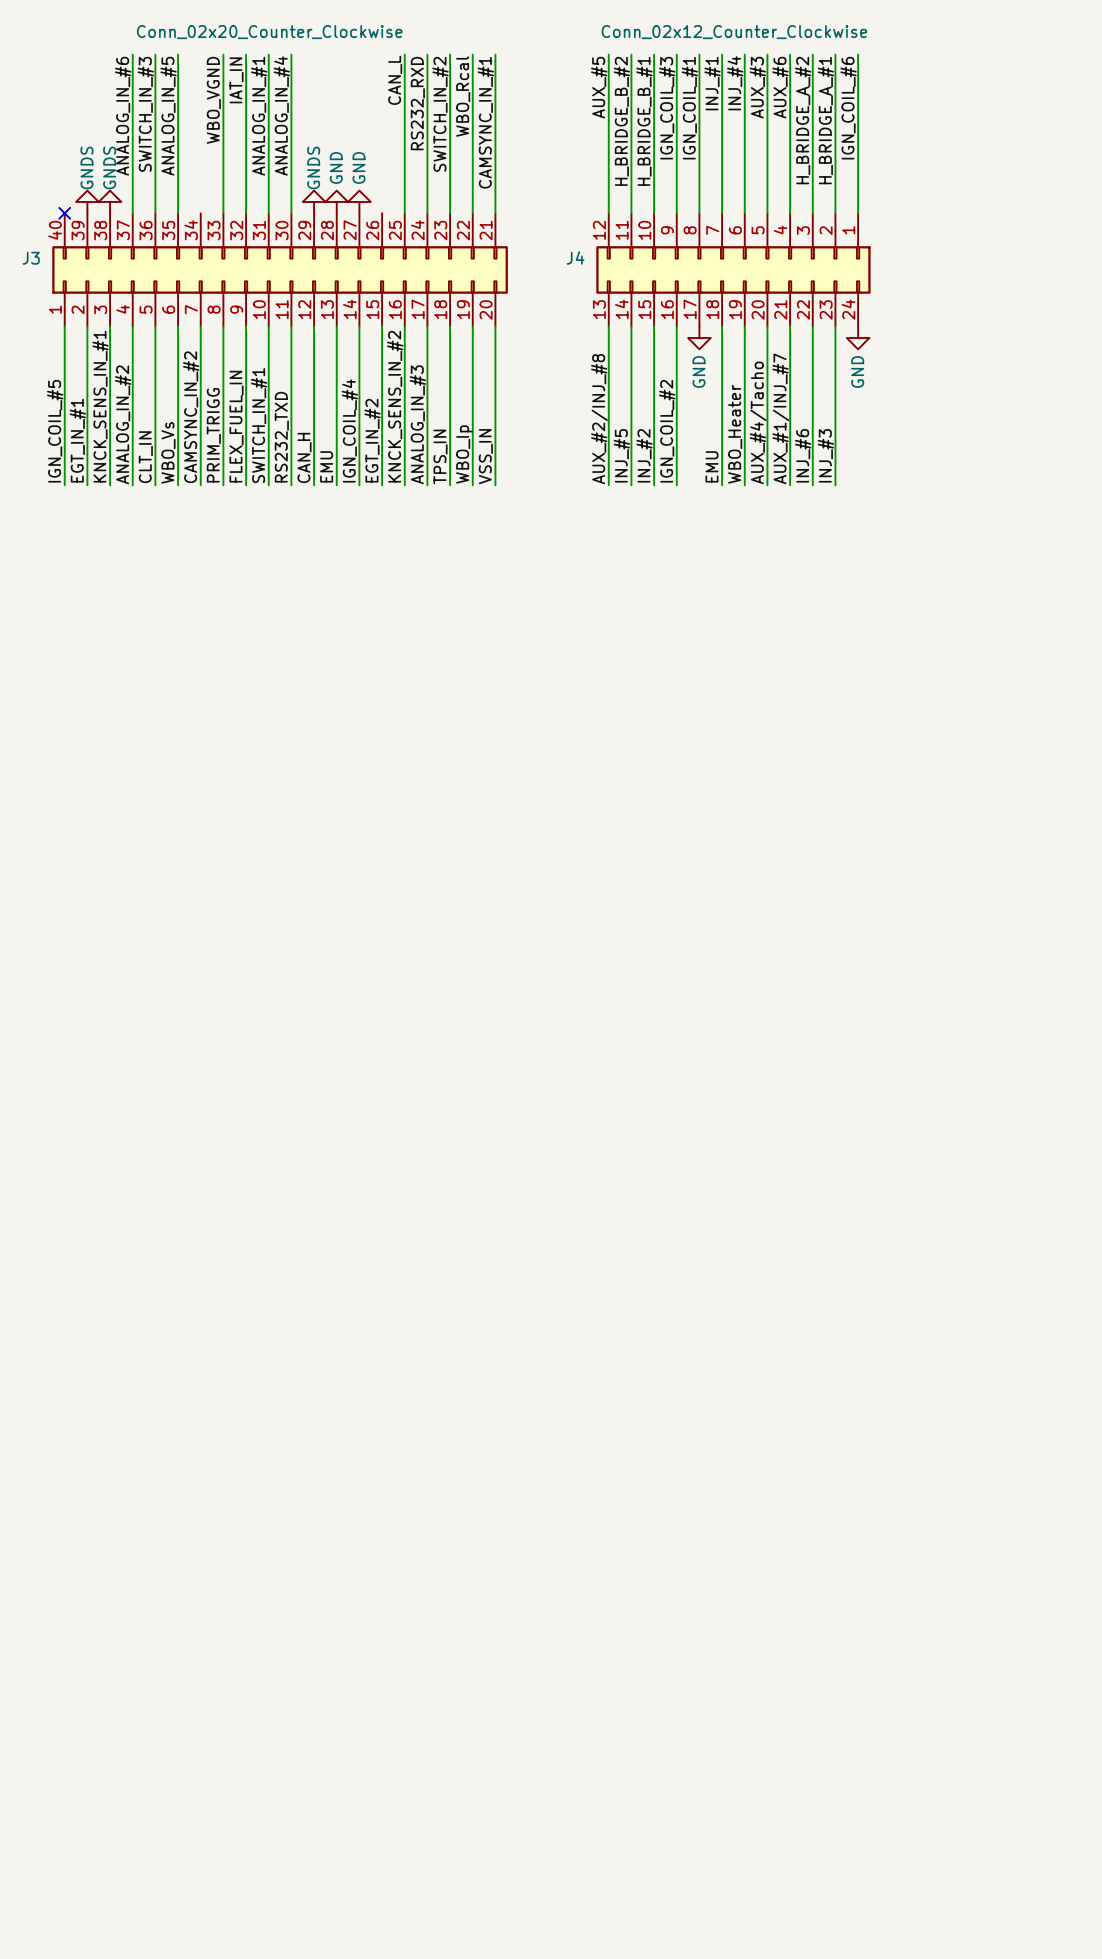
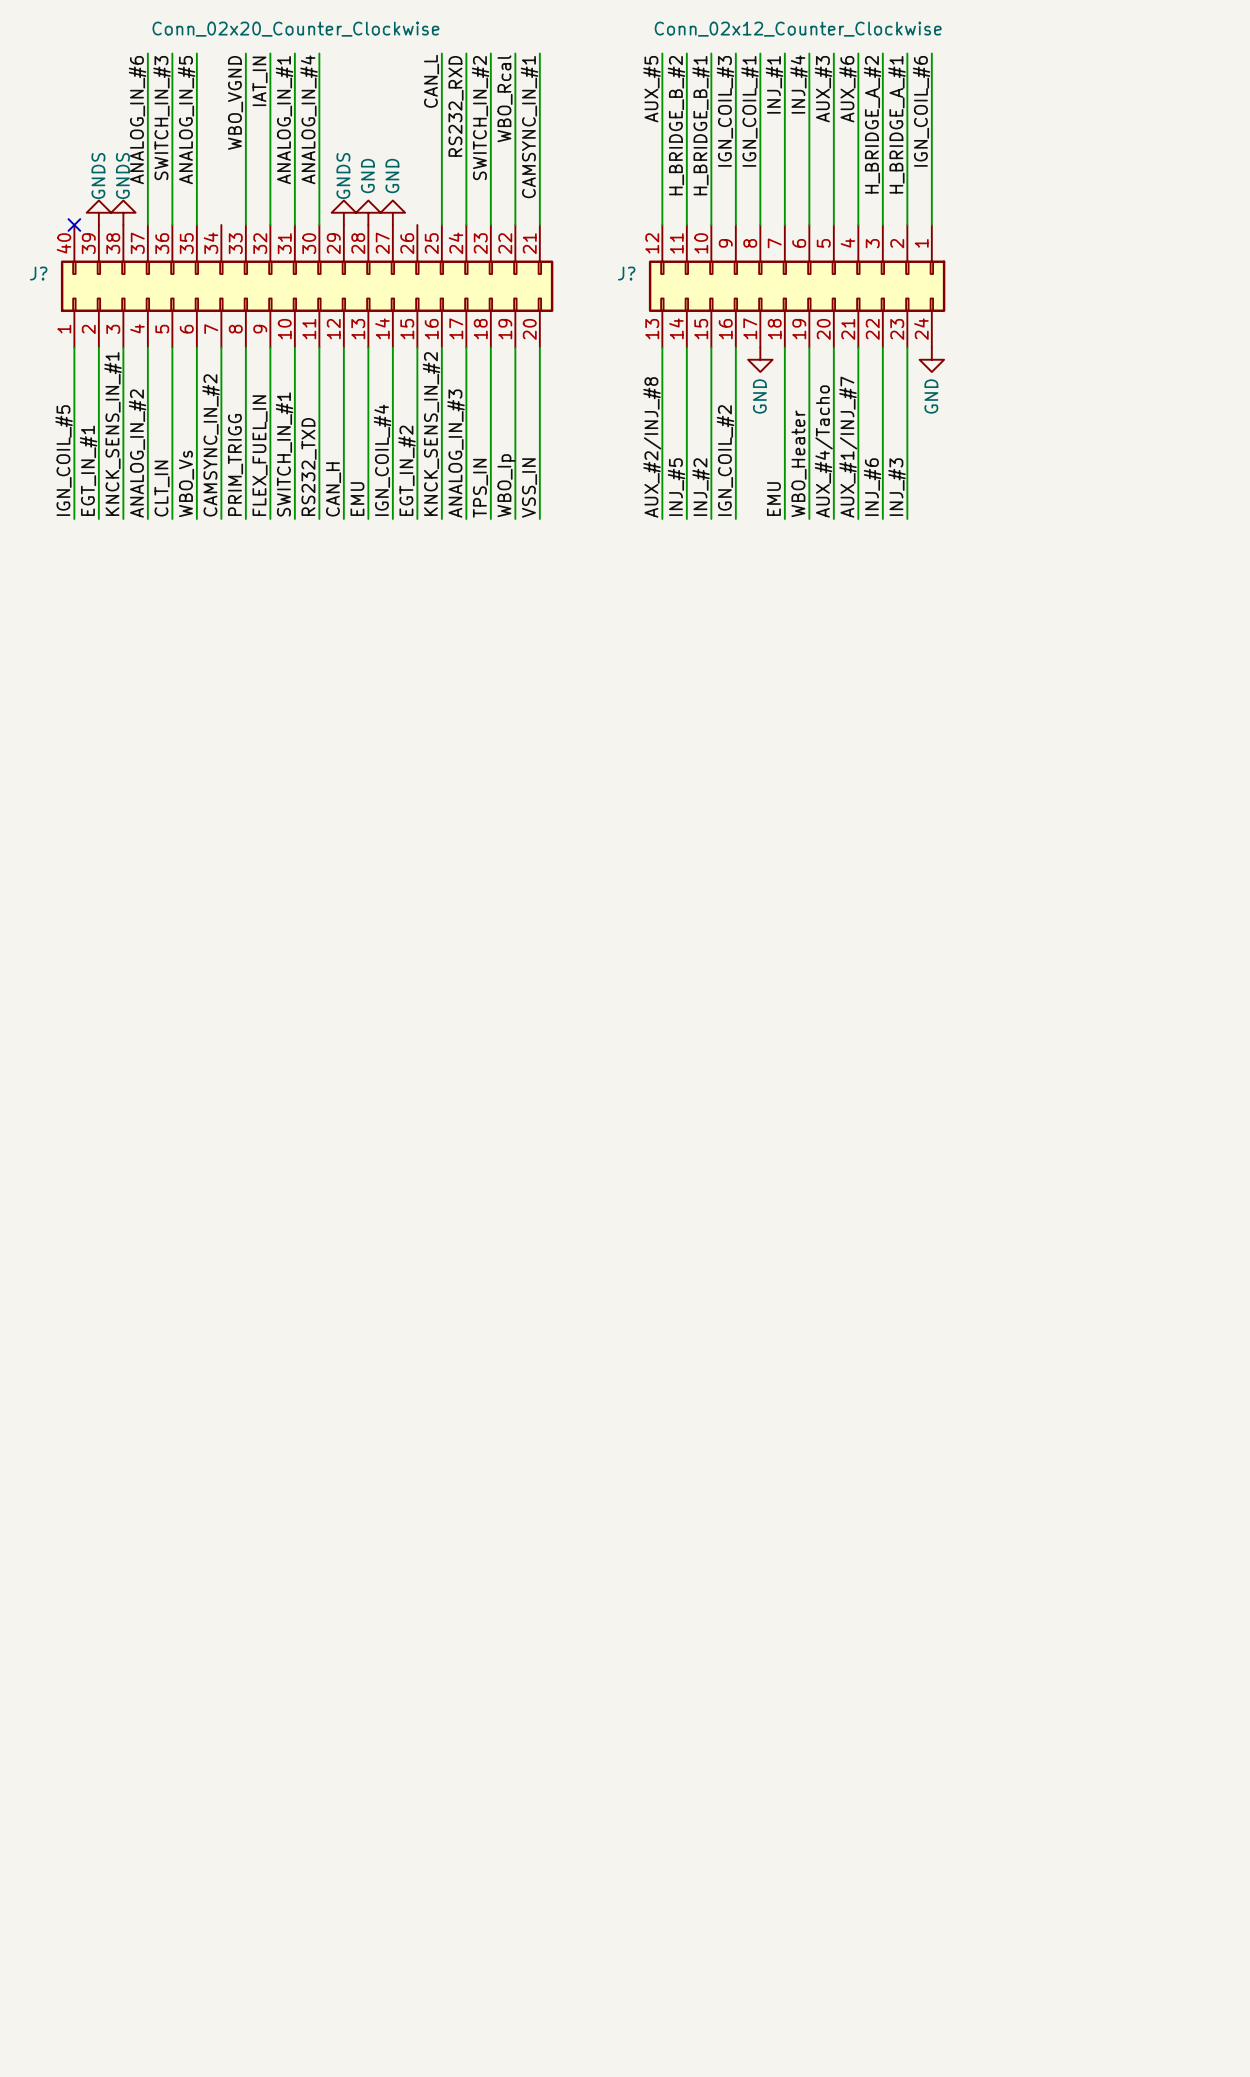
J4 name: J4 (575, 257) -> J? (626, 273)
J3 name: J3 (31, 258) -> J? (38, 273)

